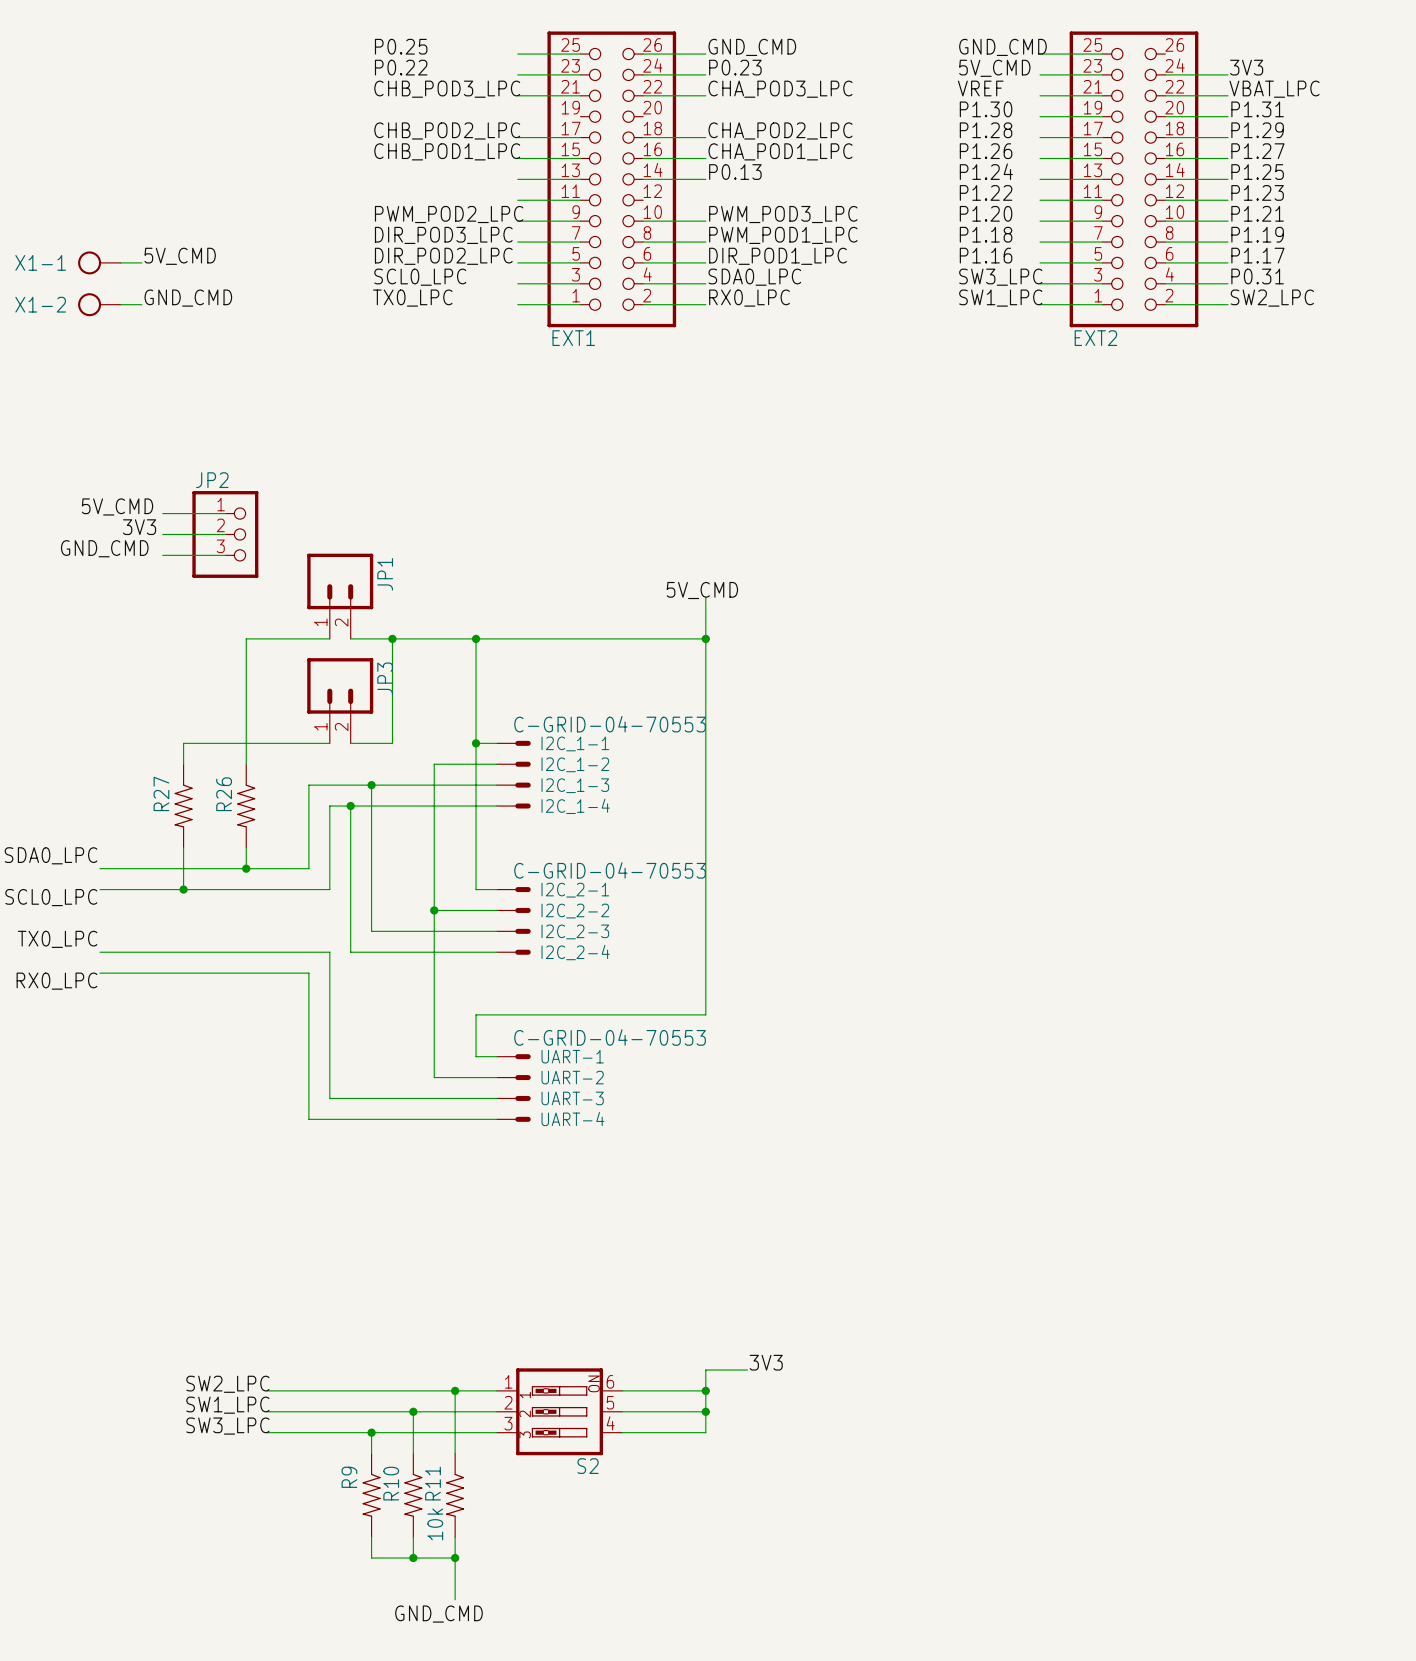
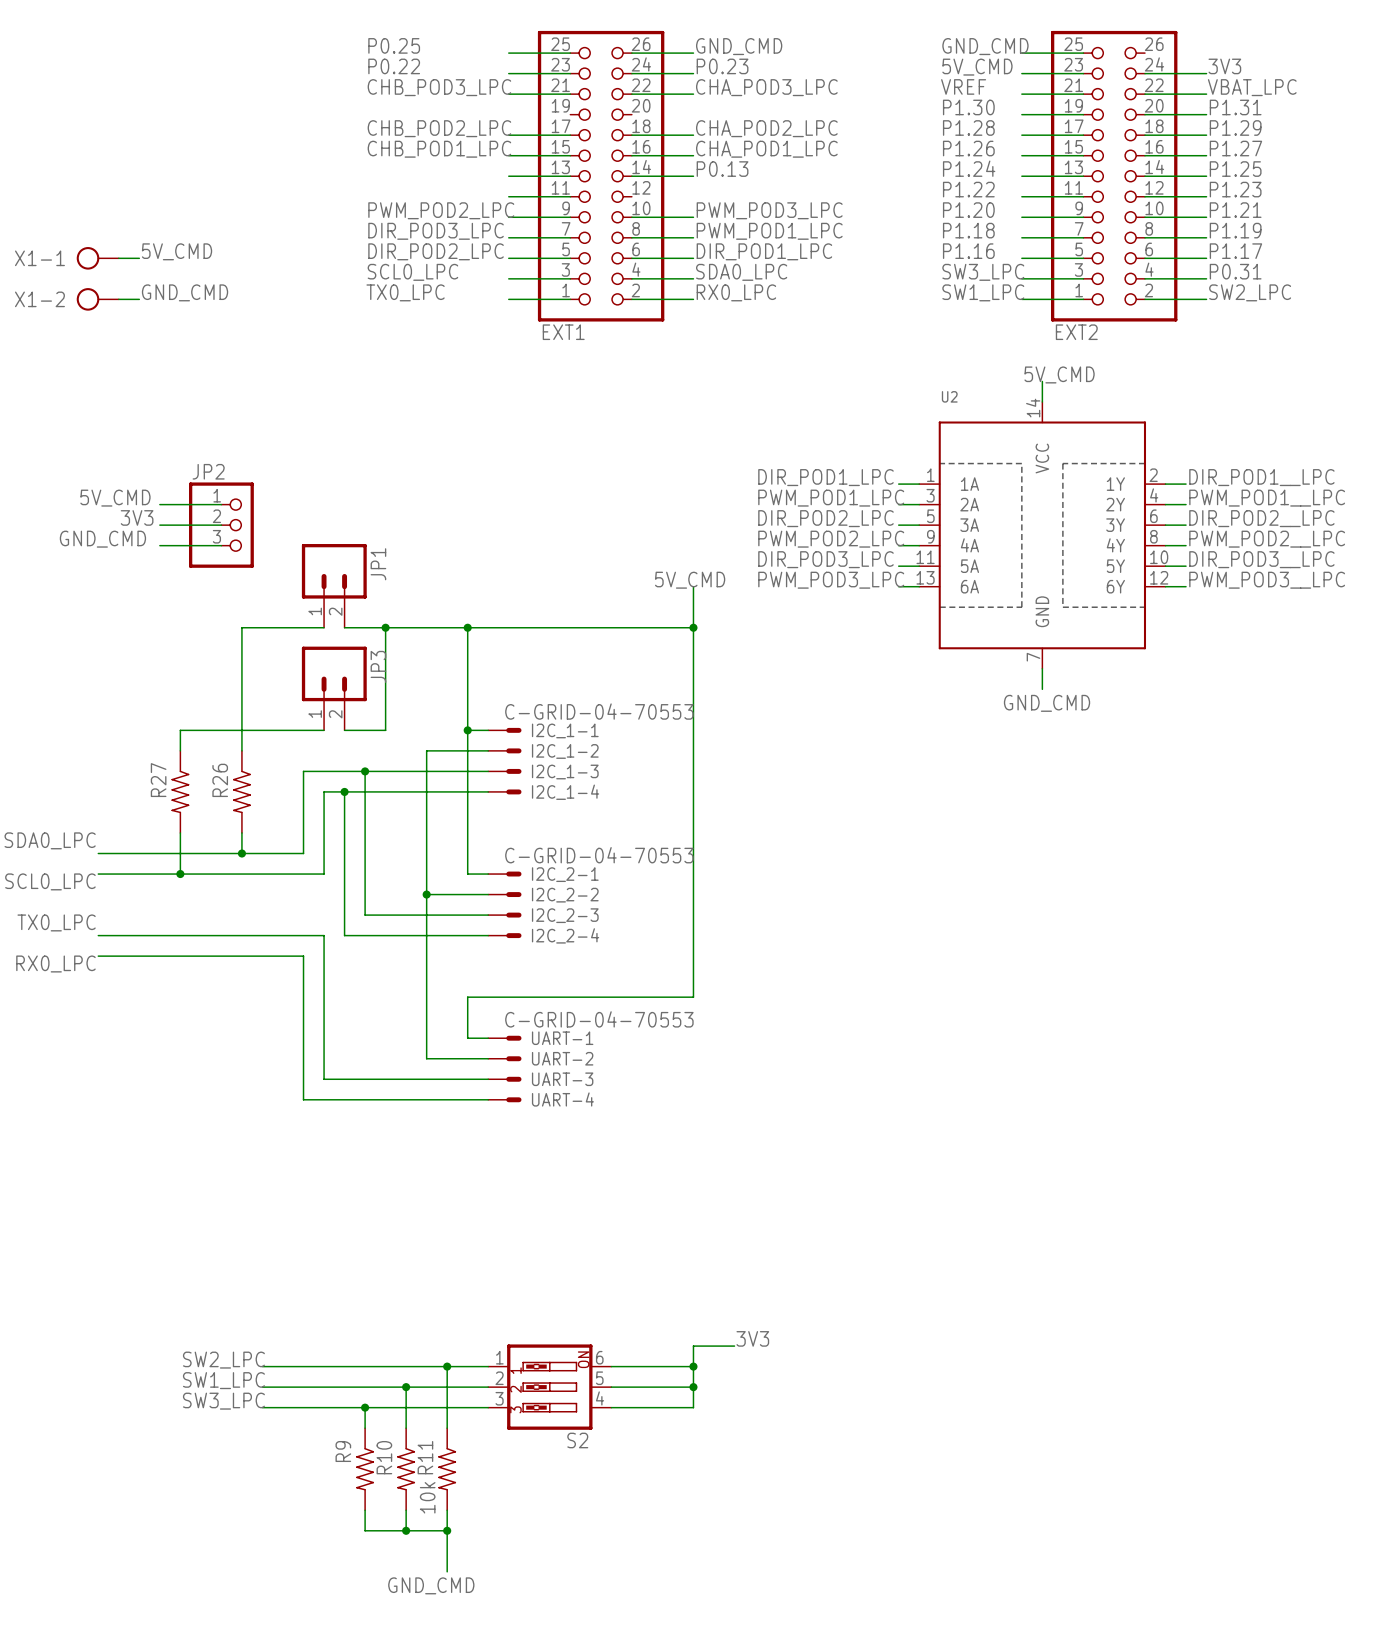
label: none -> 5V_CMD (1059, 374)
wire: none -> (1042, 381) (1042, 401)
label: none -> DIR_POD1_LPC (825, 477)
label: none -> DIR_POD1__LPC (1261, 477)
wire: none -> (898, 484) (919, 484)
wire: none -> (1165, 484) (1186, 484)
label: none -> PWM_POD1_LPC (831, 498)
label: none -> PWM_POD1__LPC (1267, 498)
wire: none -> (898, 504) (919, 504)
wire: none -> (1165, 504) (1186, 504)
label: none -> DIR_POD2_LPC (825, 518)
label: none -> DIR_POD2__LPC (1261, 518)
wire: none -> (898, 525) (919, 525)
wire: none -> (1165, 525) (1186, 525)
U2: none -> (1042, 535)
label: none -> PWM_POD2_LPC (831, 539)
label: none -> PWM_POD2__LPC (1267, 539)
wire: none -> (898, 545) (919, 545)
wire: none -> (1165, 545) (1186, 545)
label: none -> DIR_POD3_LPC (825, 559)
label: none -> DIR_POD3__LPC (1261, 559)
wire: none -> (898, 566) (919, 566)
wire: none -> (1165, 566) (1186, 566)
label: none -> PWM_POD3_LPC (831, 580)
label: none -> PWM_POD3__LPC (1267, 580)
wire: none -> (898, 586) (919, 586)
wire: none -> (1165, 586) (1186, 586)
wire: none -> (1042, 668) (1042, 689)
label: none -> GND_CMD (1047, 703)

